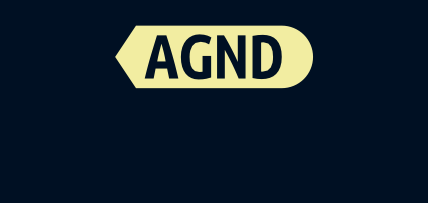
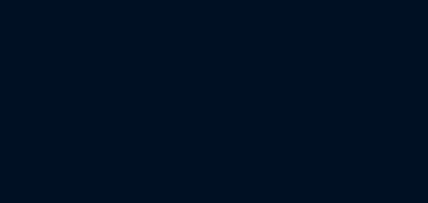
drawing: [115, 25, 314, 89] -> none

